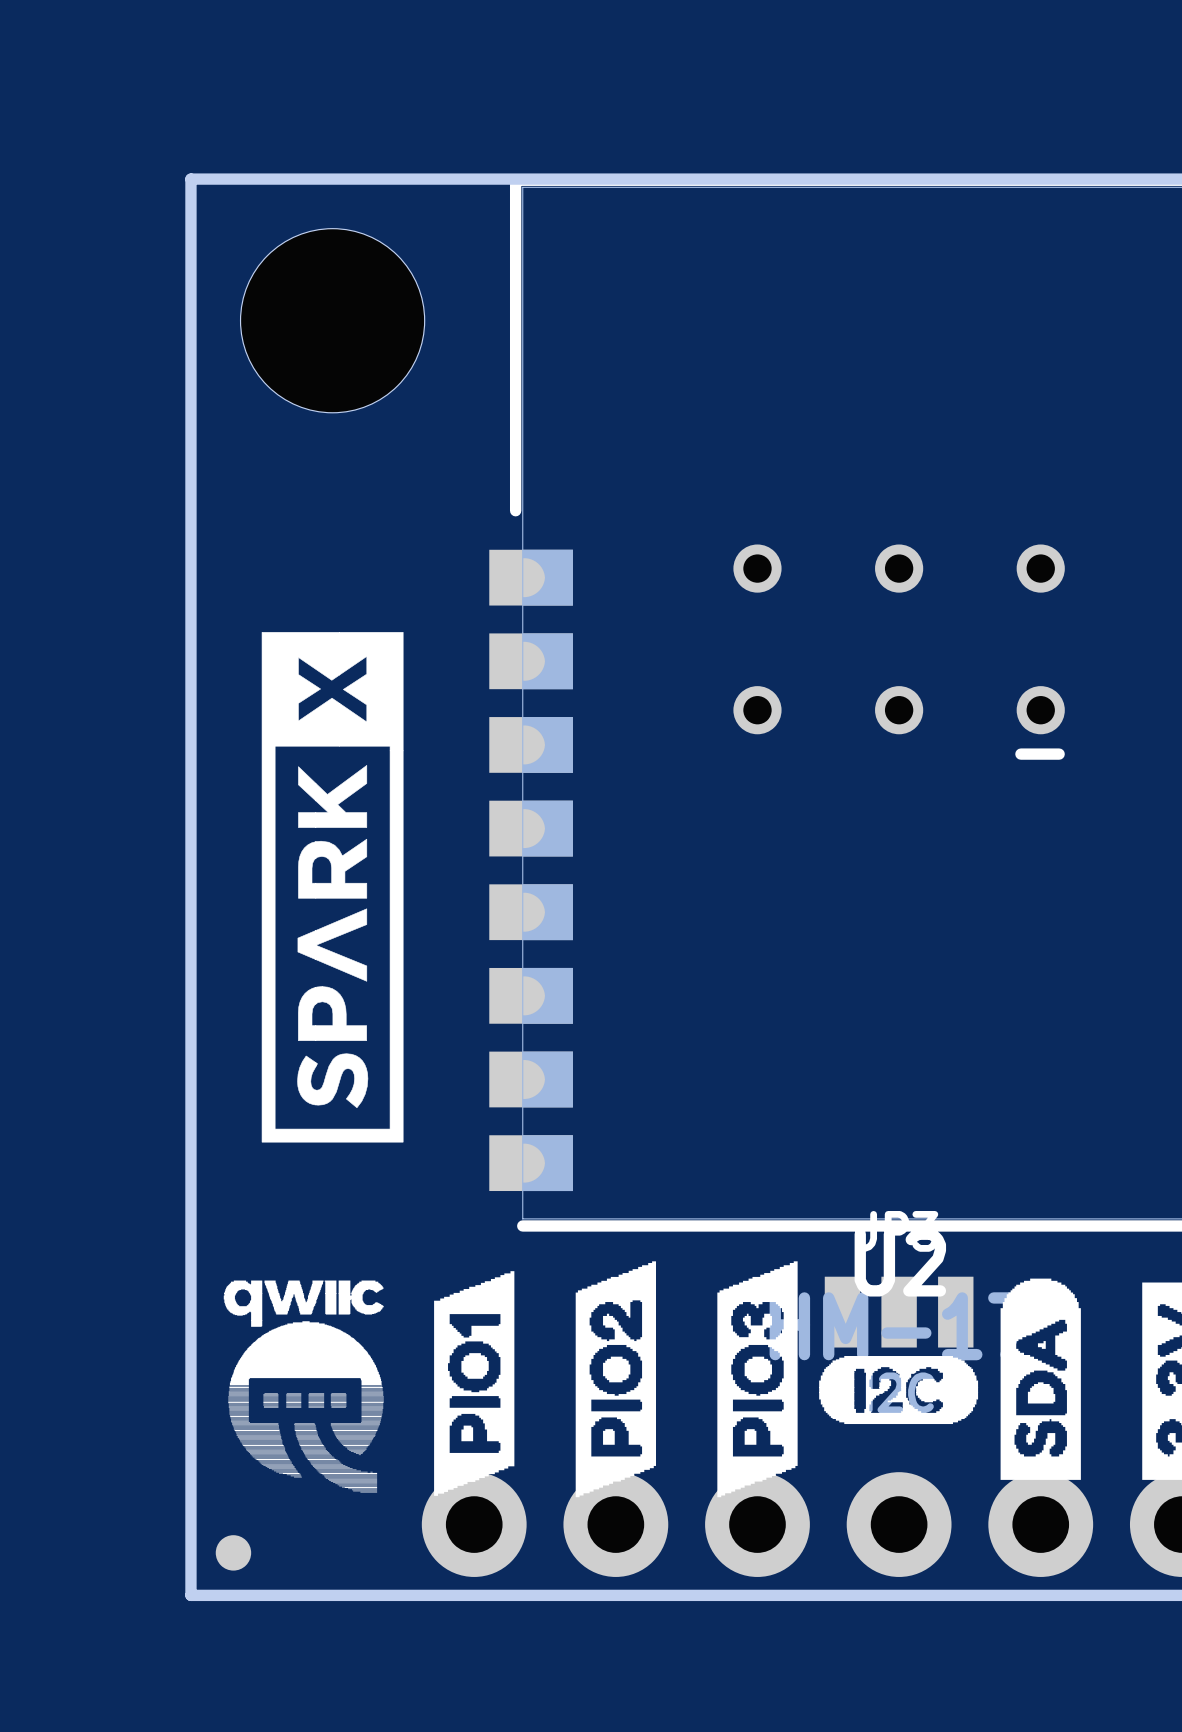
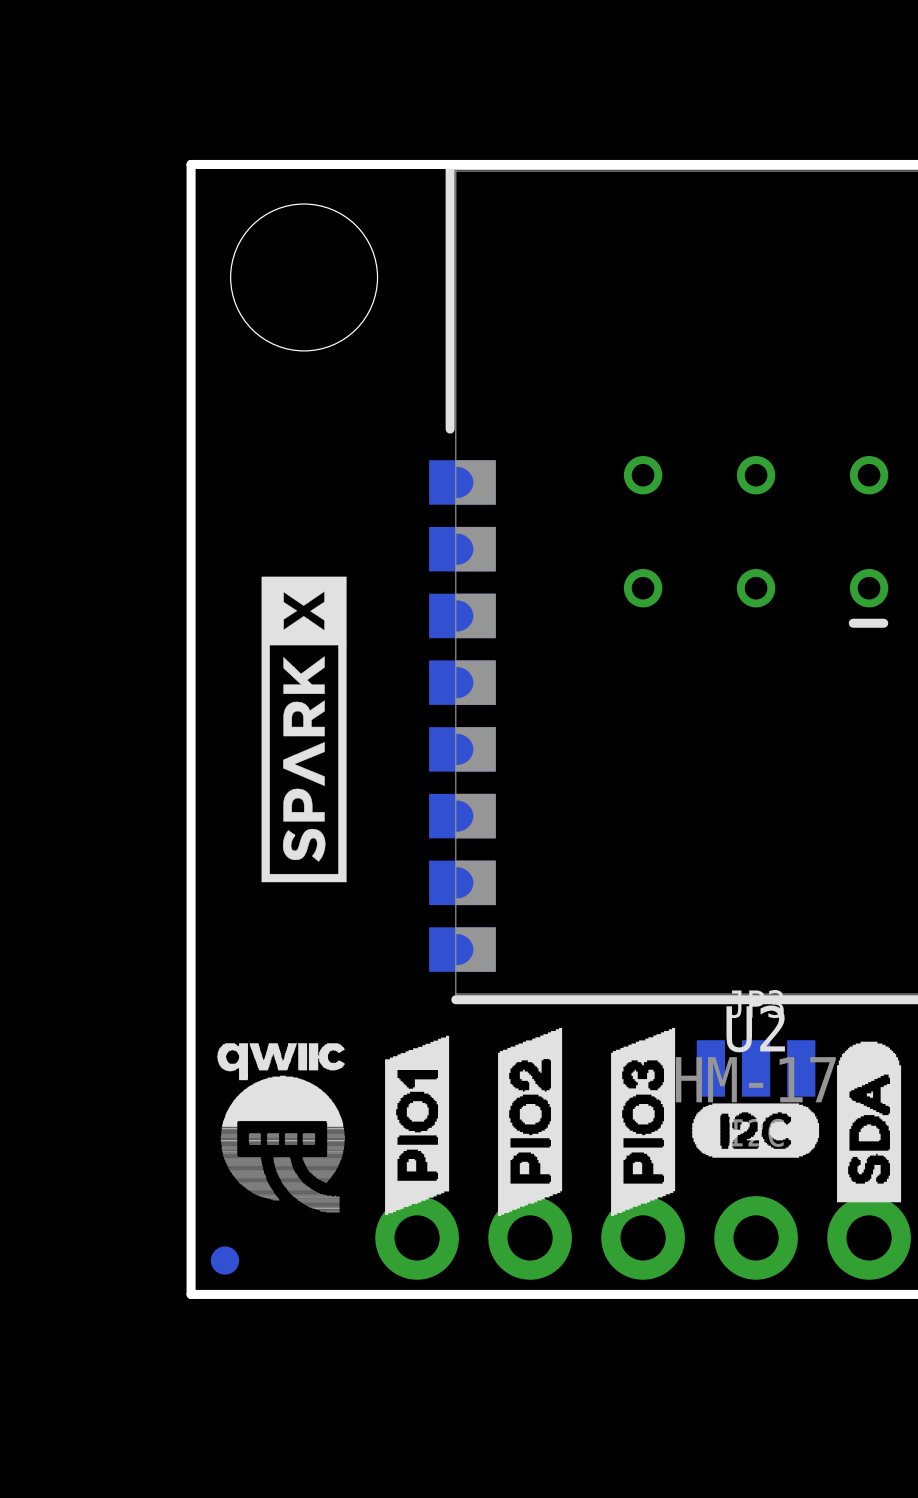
drawing shape: [261, 632, 404, 1143] -> [261, 576, 347, 883]

